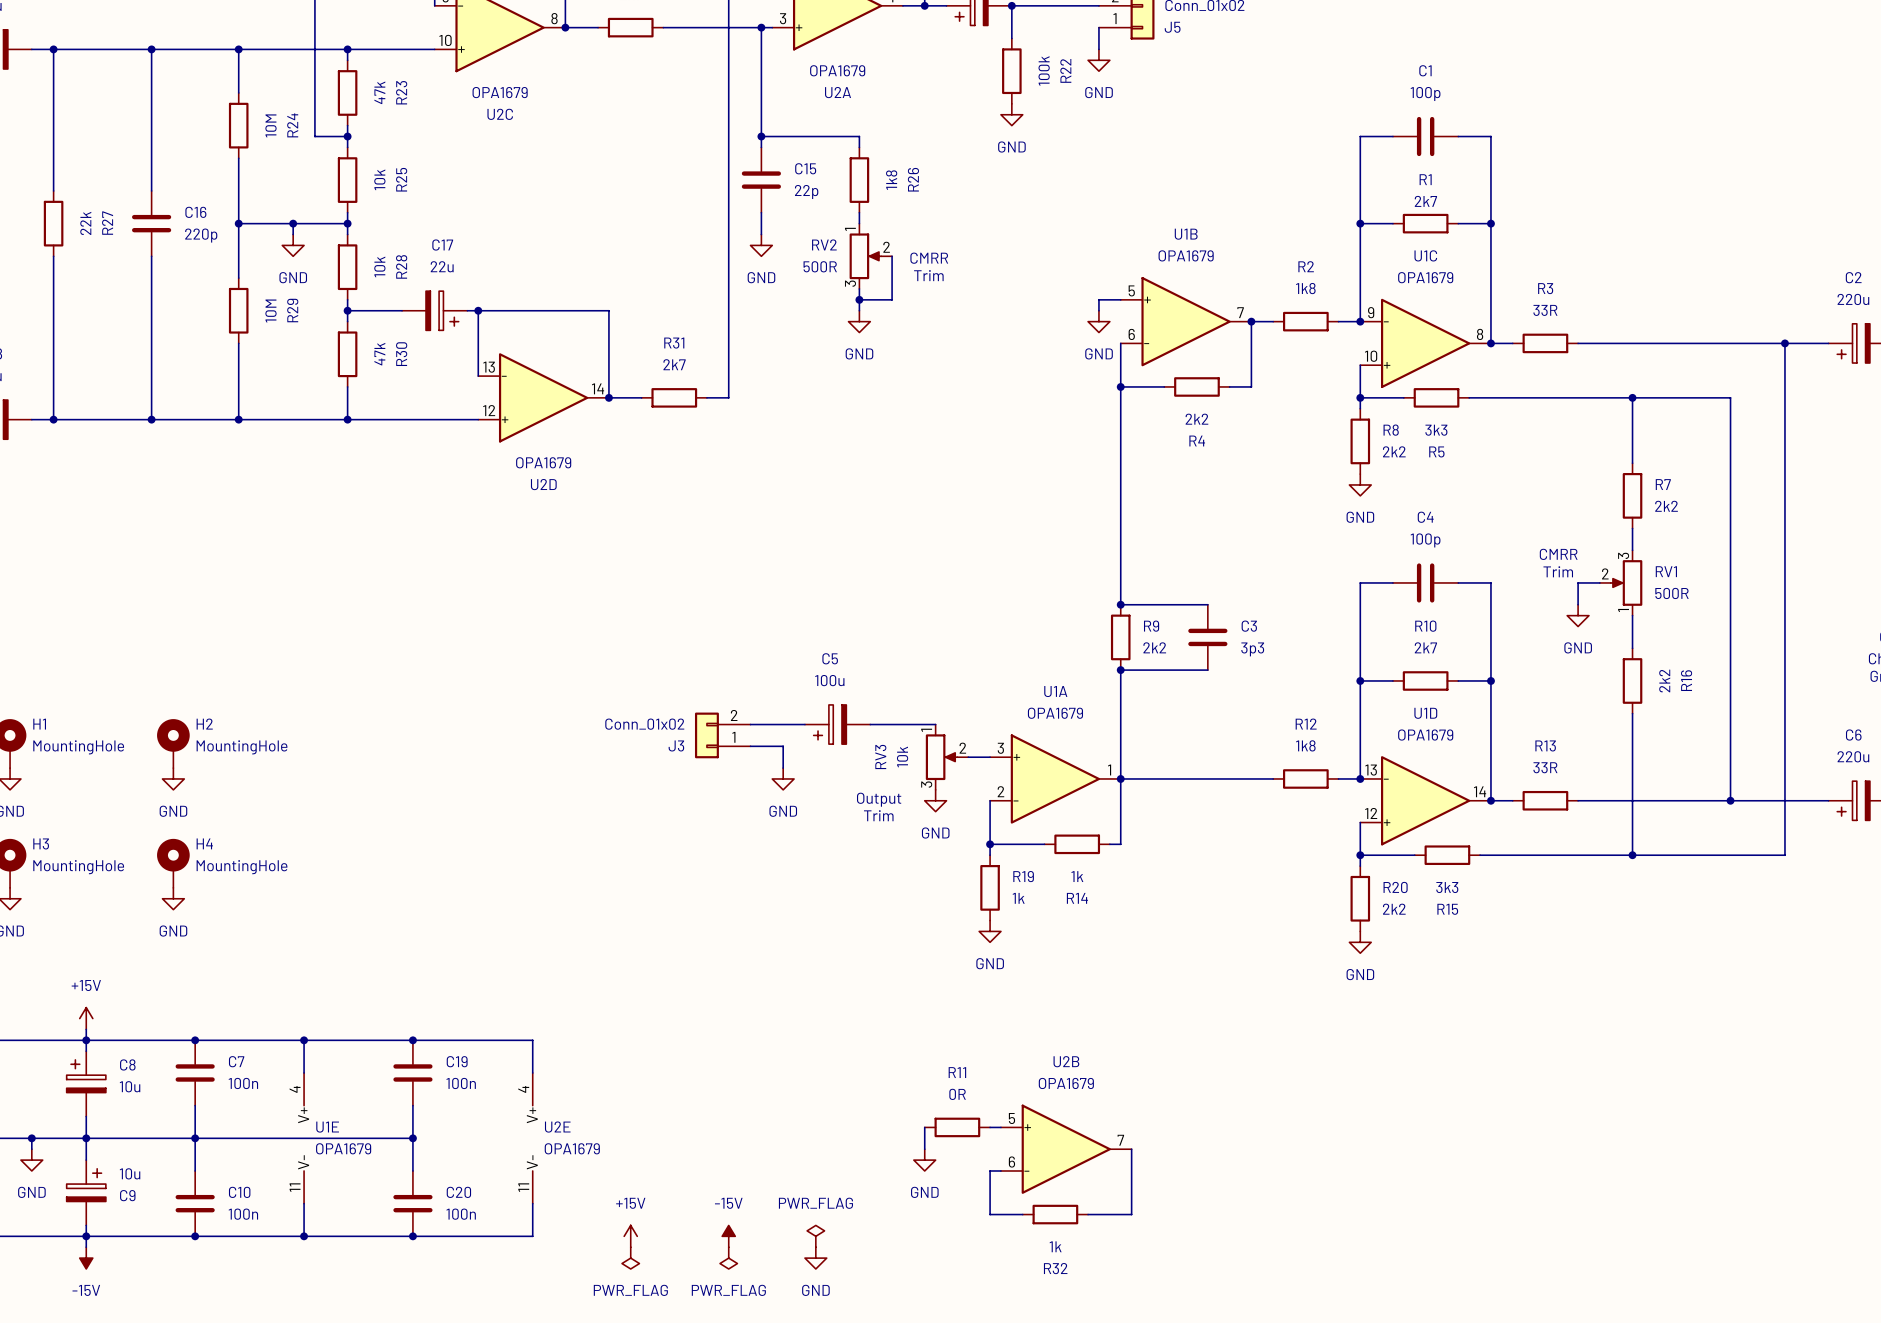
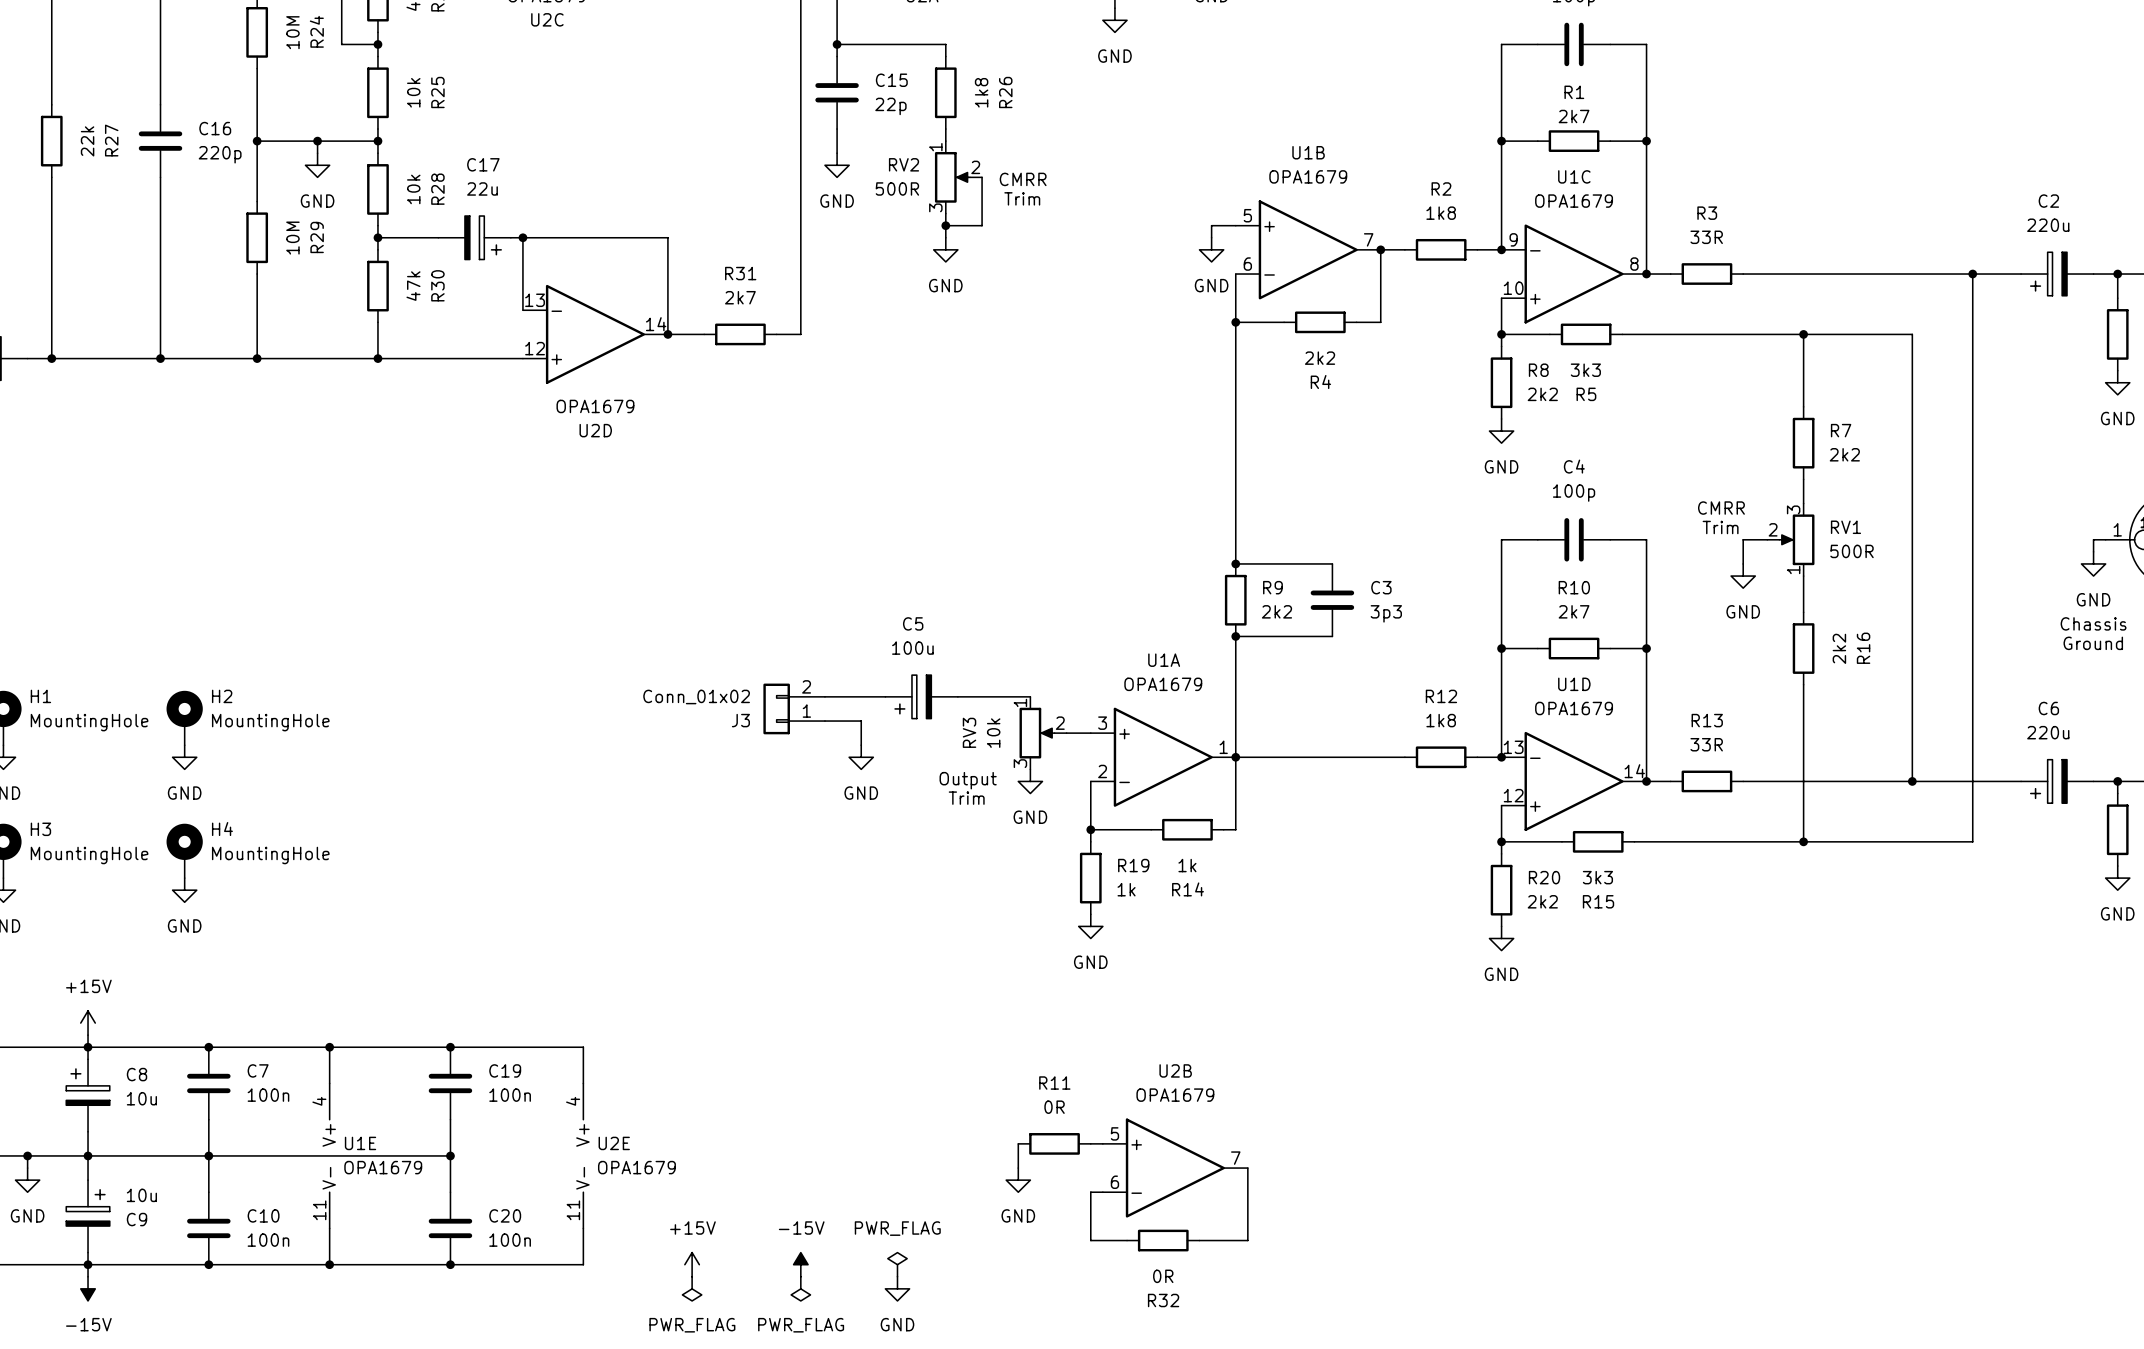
R32 value: 1k (1055, 1246) -> 0R (1163, 1276)

